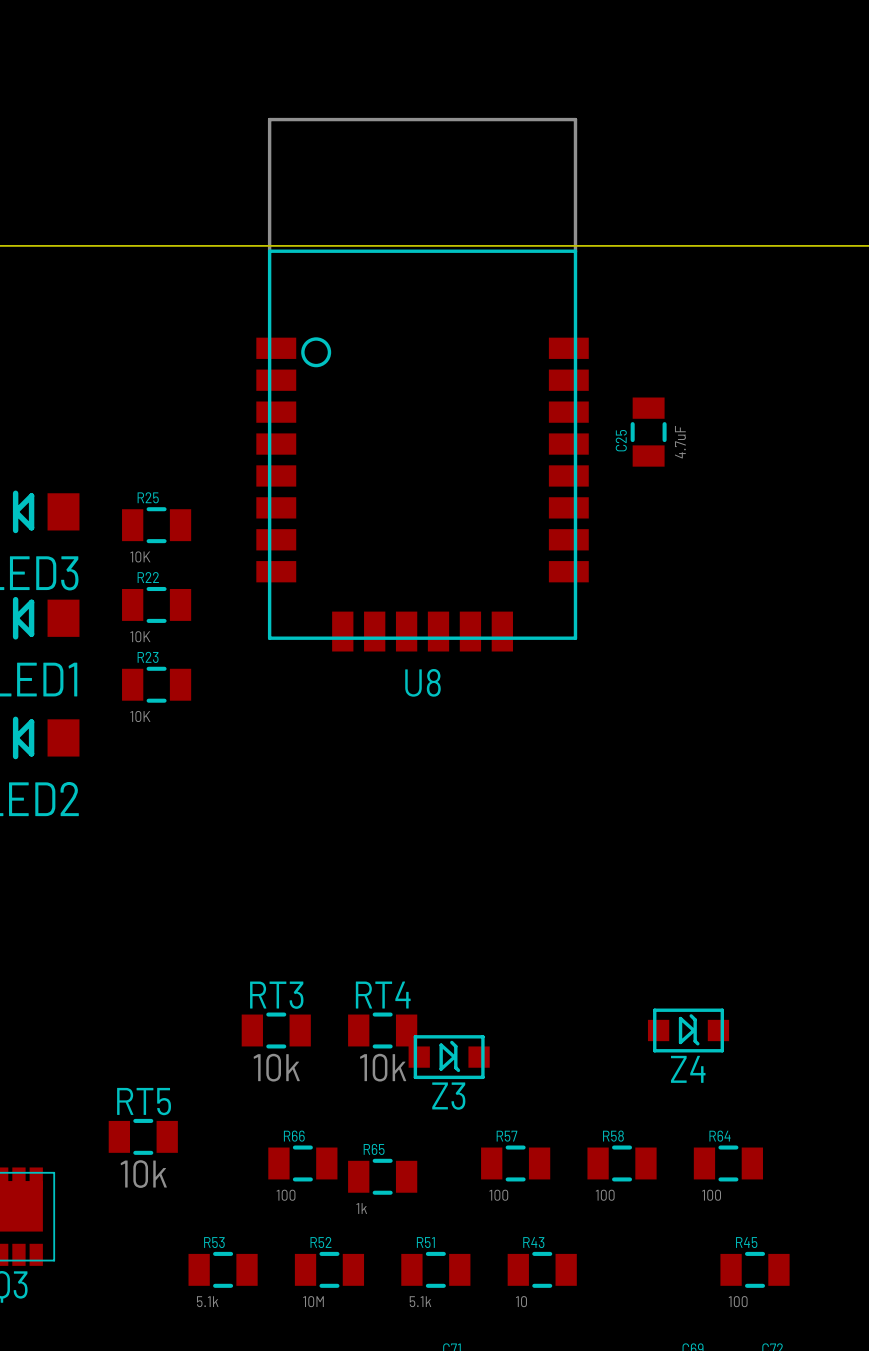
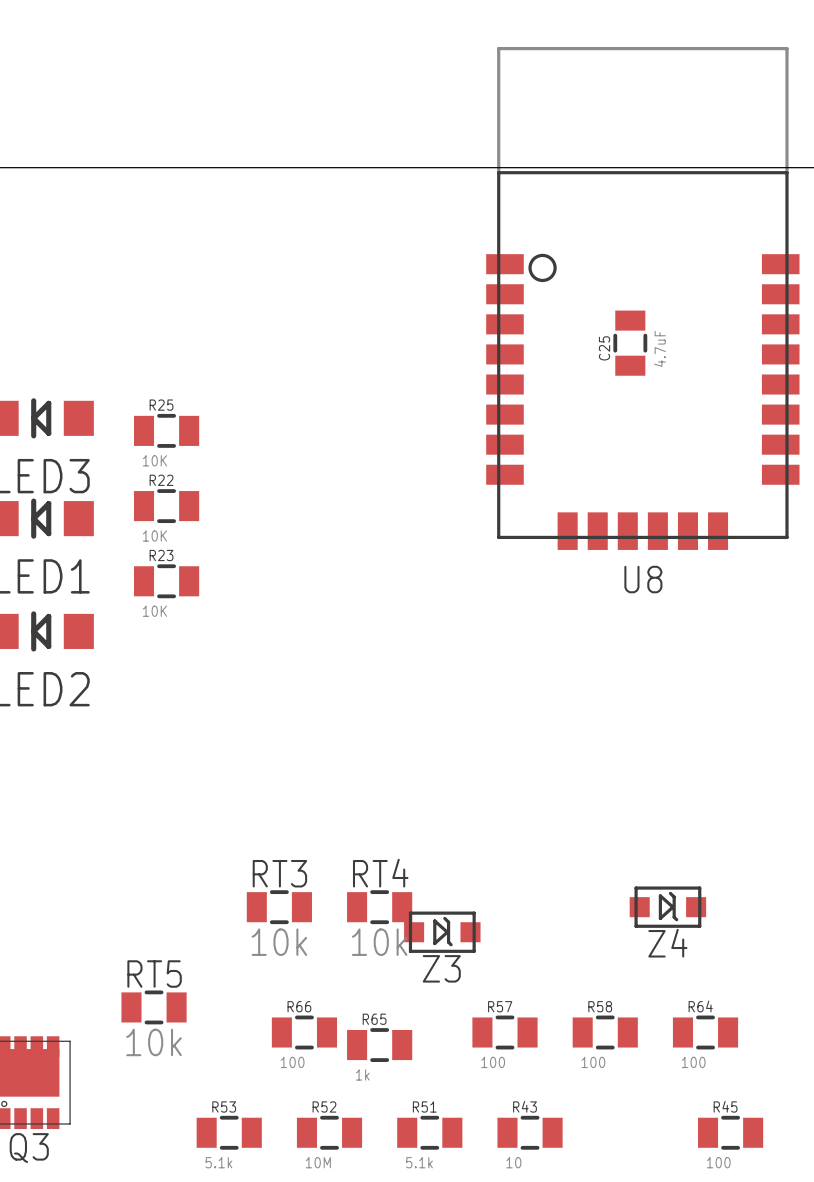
U8 position: (422, 384) -> (642, 298)

